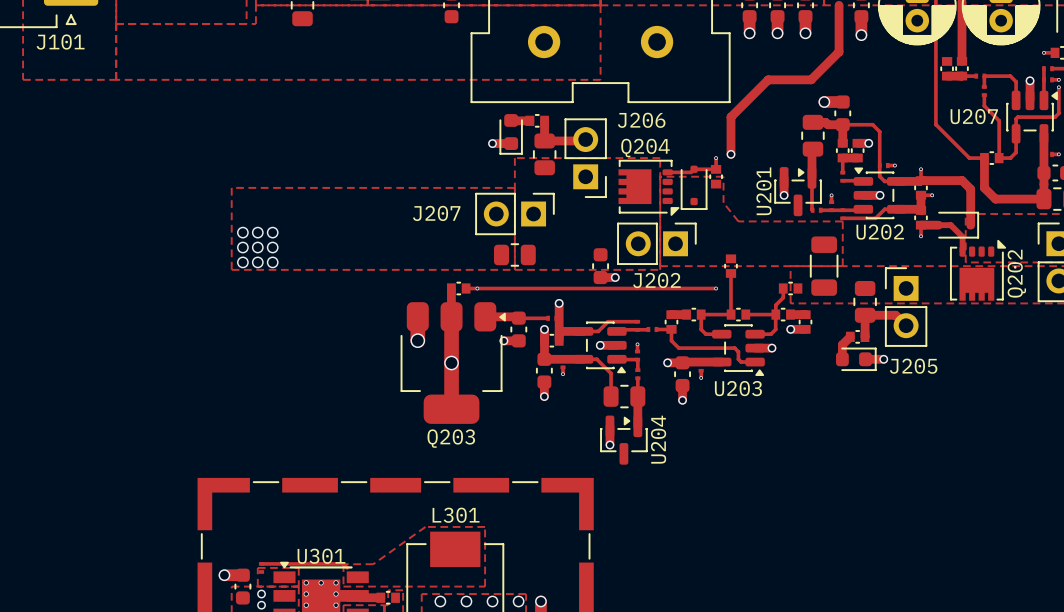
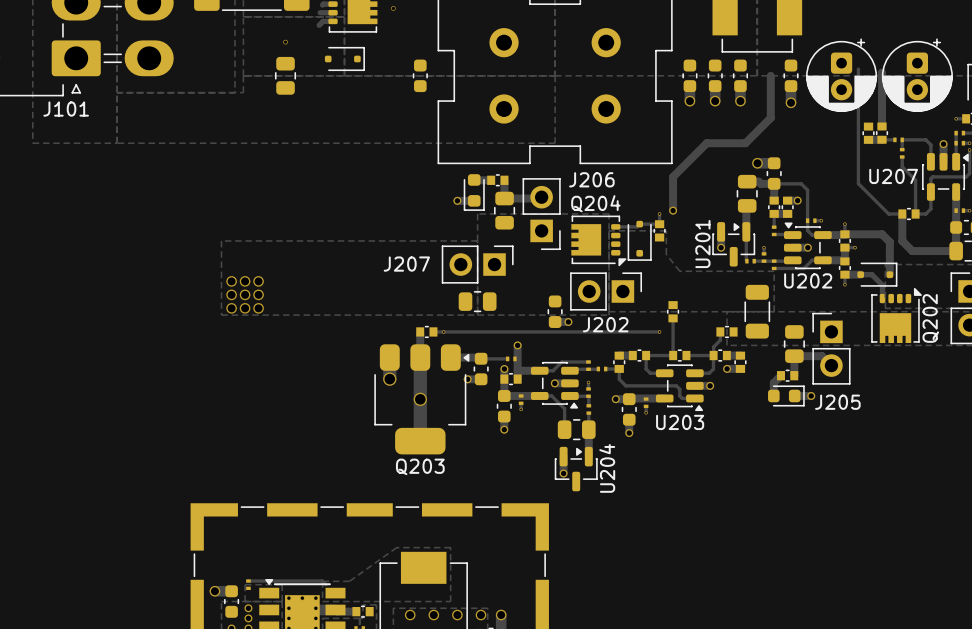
L301 name: L301 (456, 515) -> none
U301 name: U301 (321, 556) -> none

